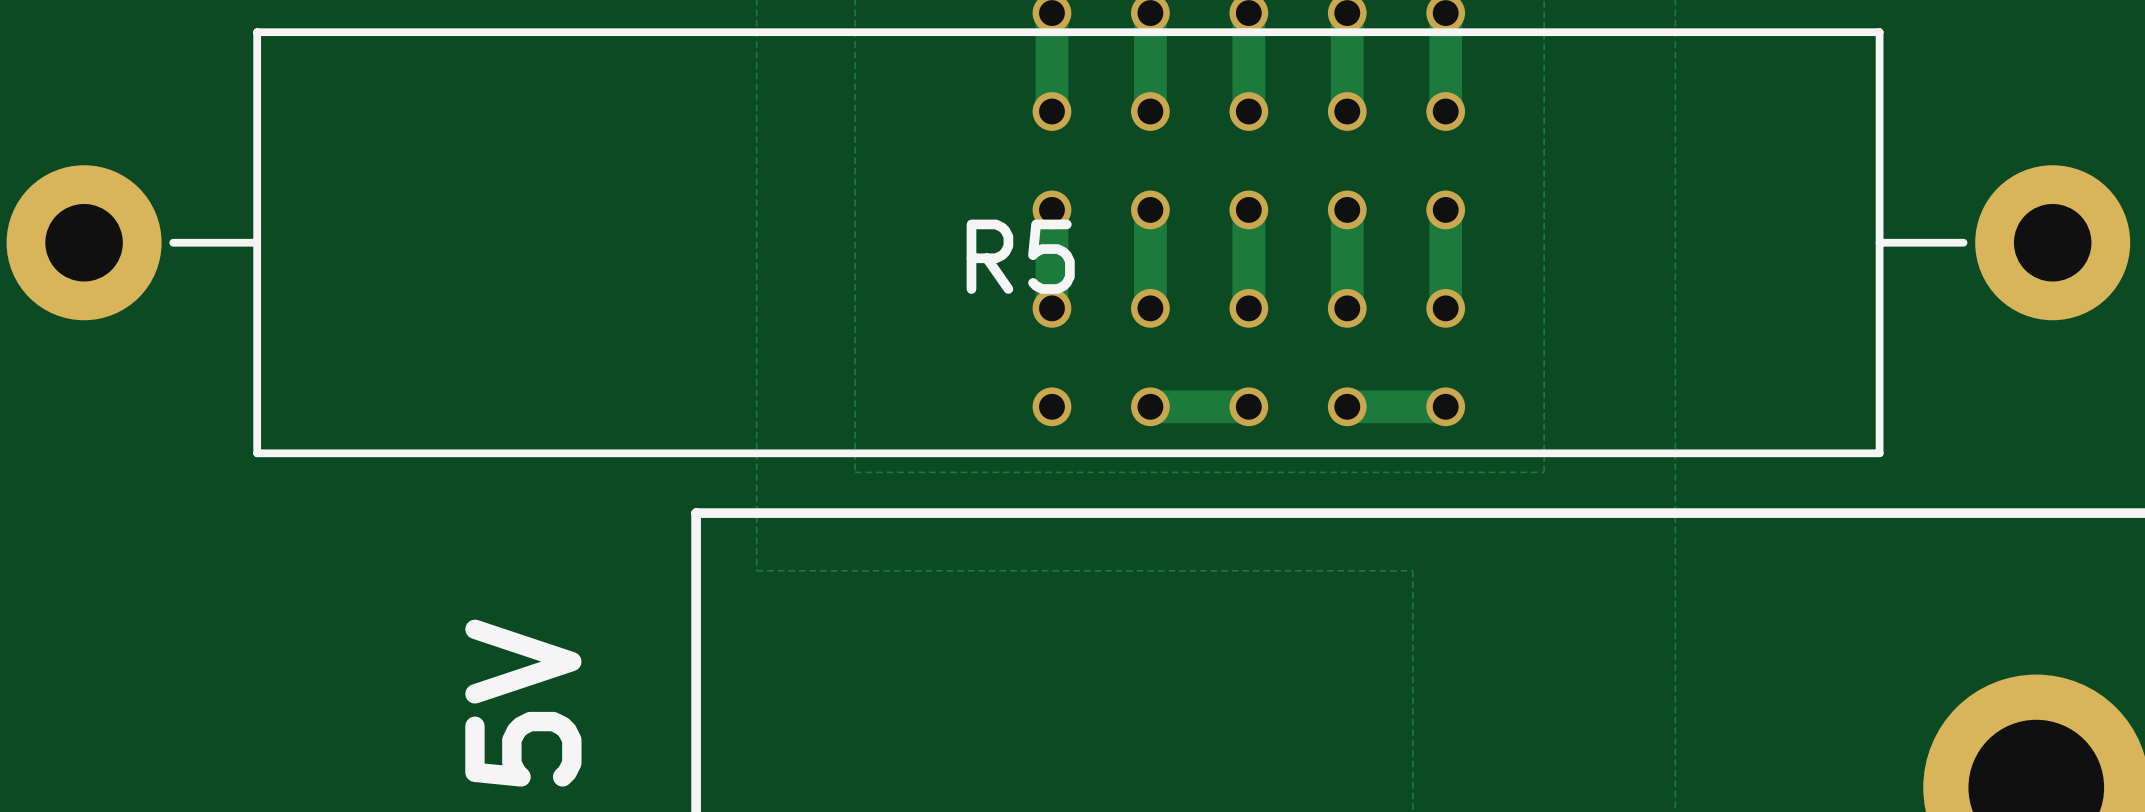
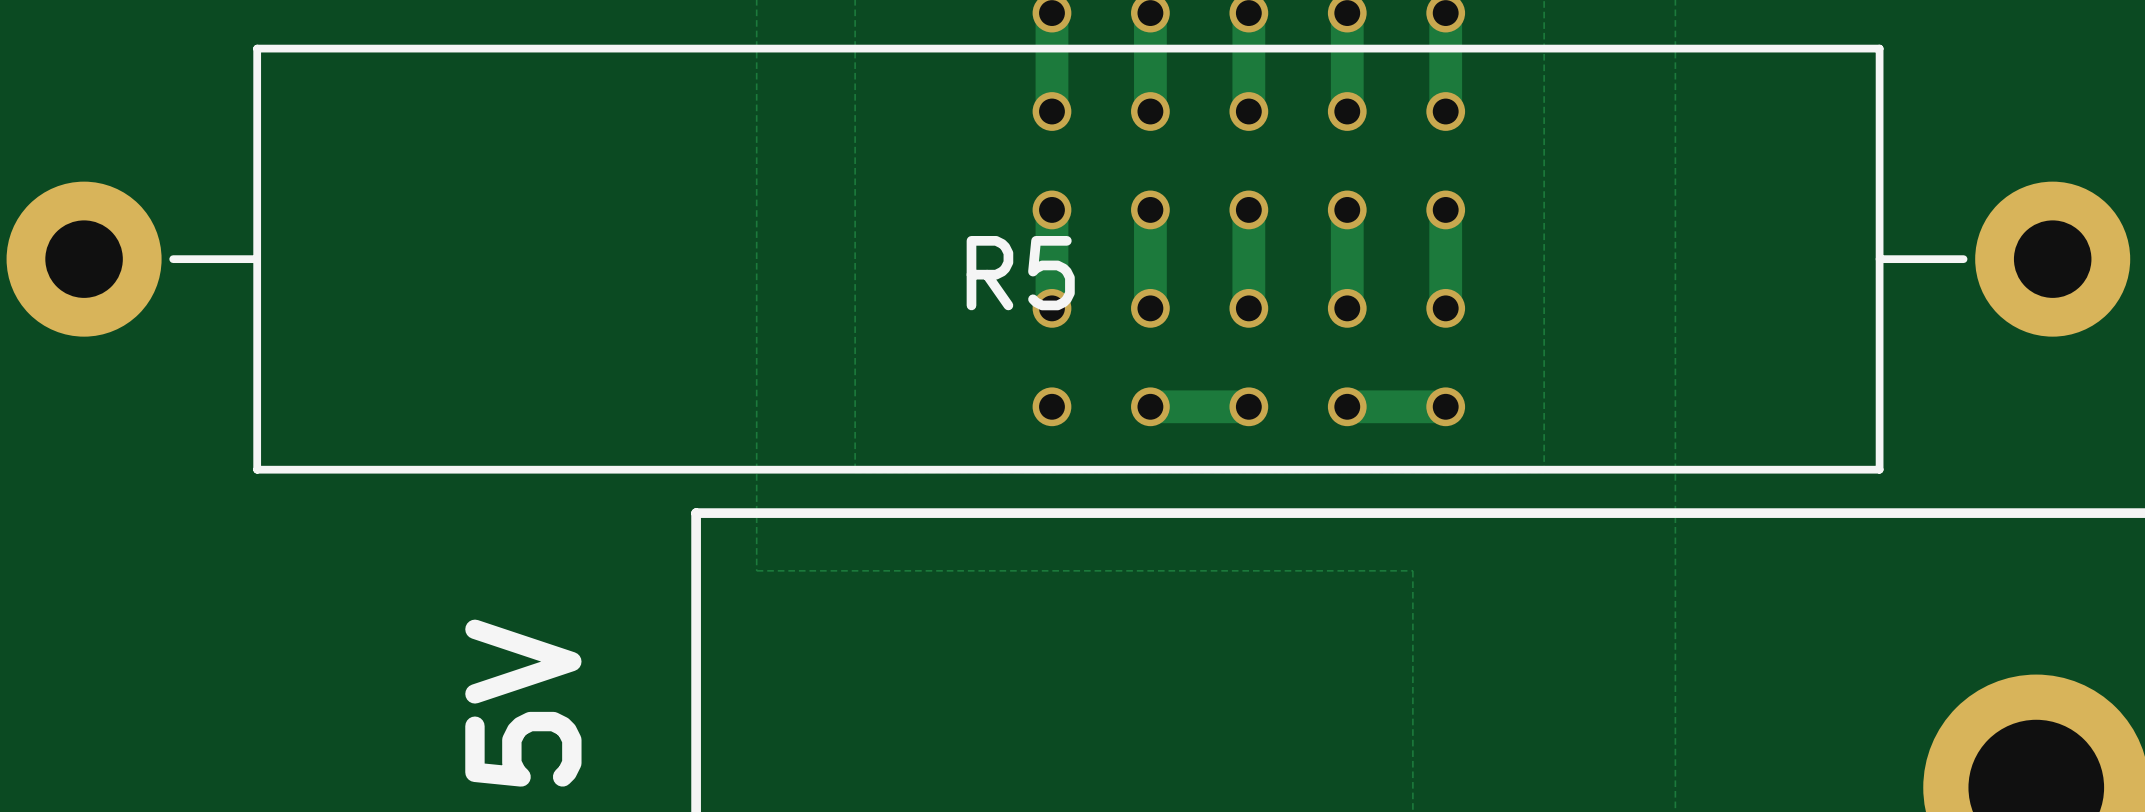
R5 position: (1068, 242) -> (1068, 259)

